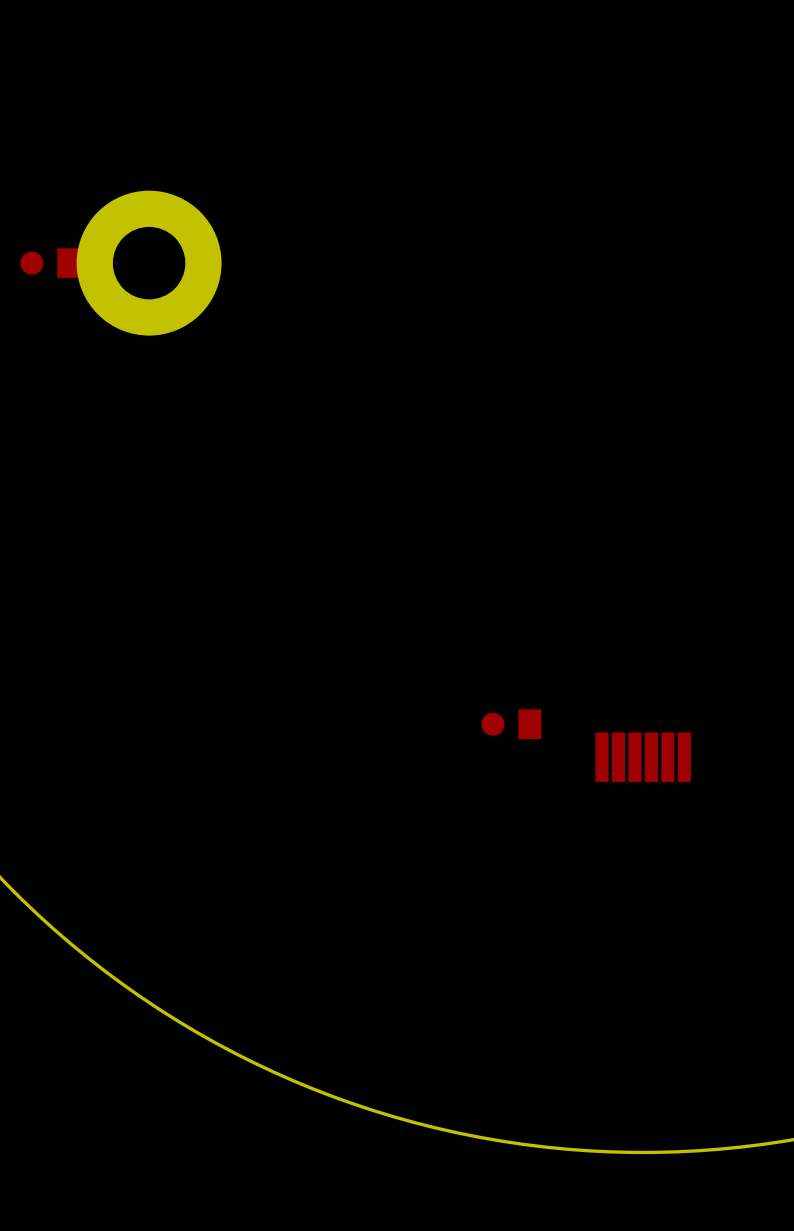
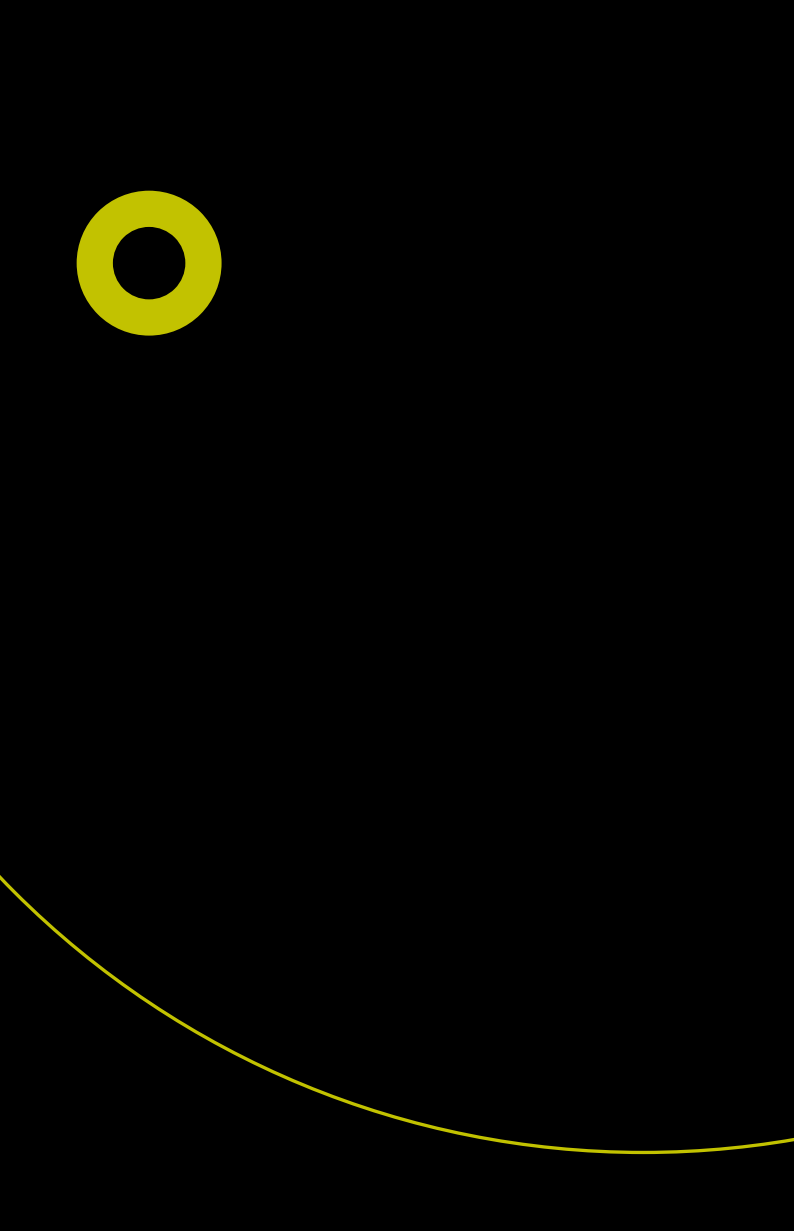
part: (50, 263) -> none
part: (511, 724) -> none
part: (643, 757) -> none

